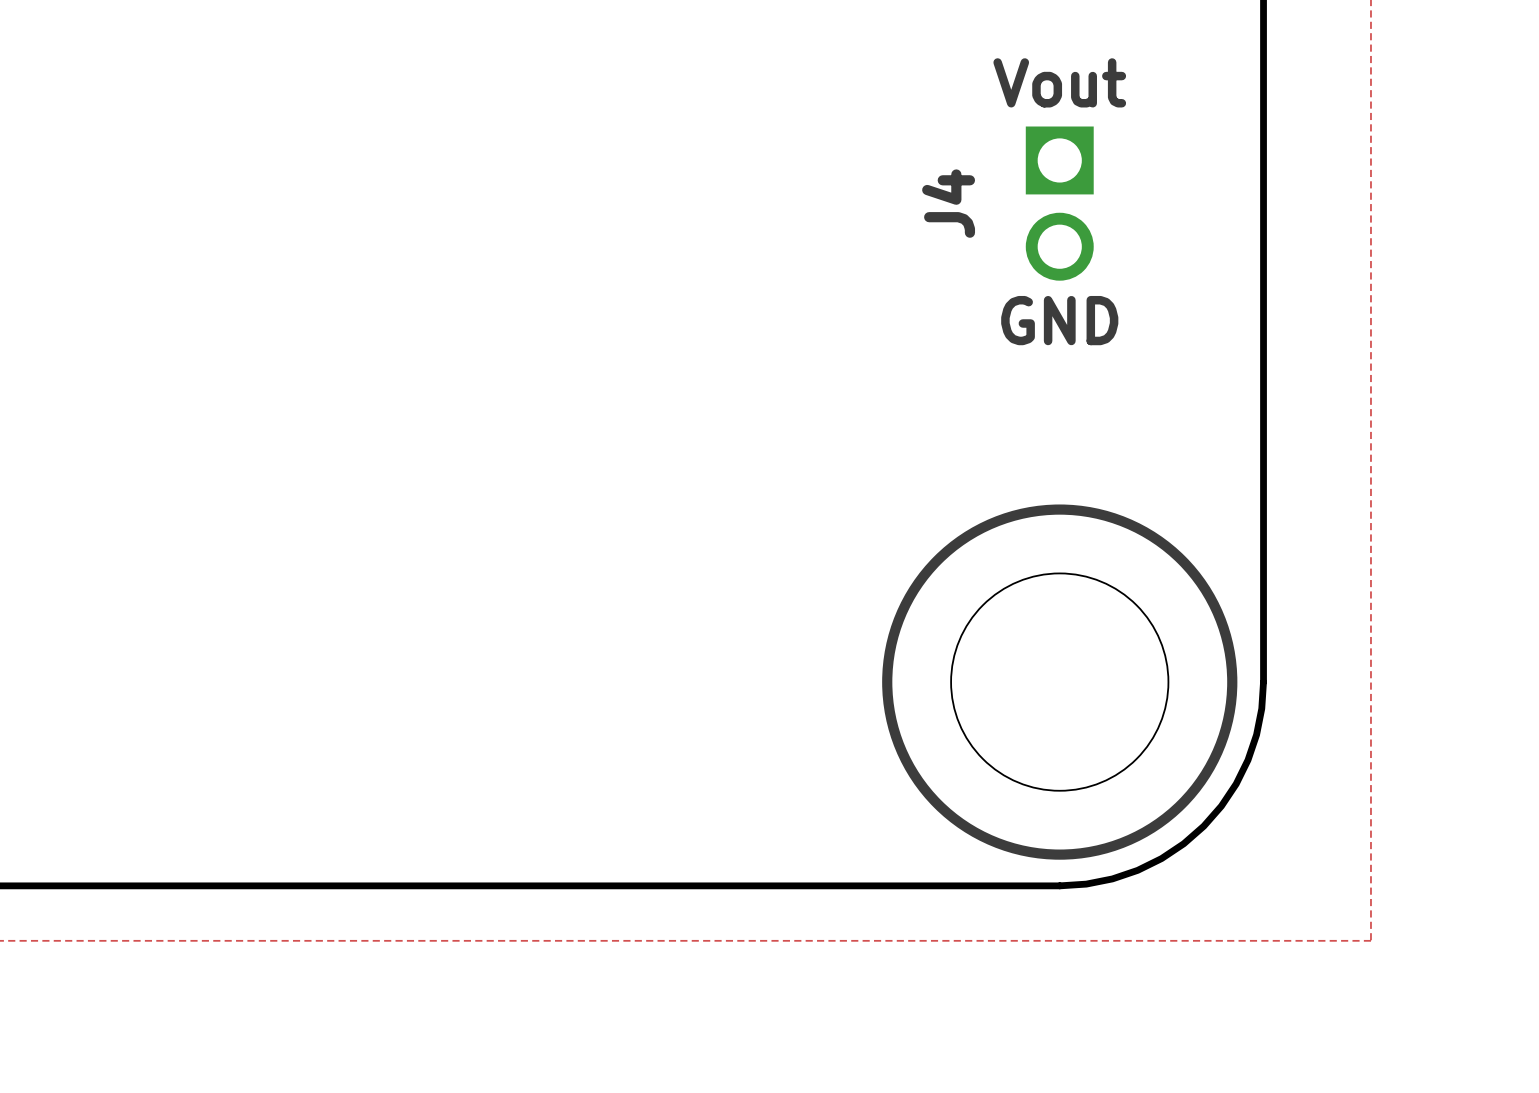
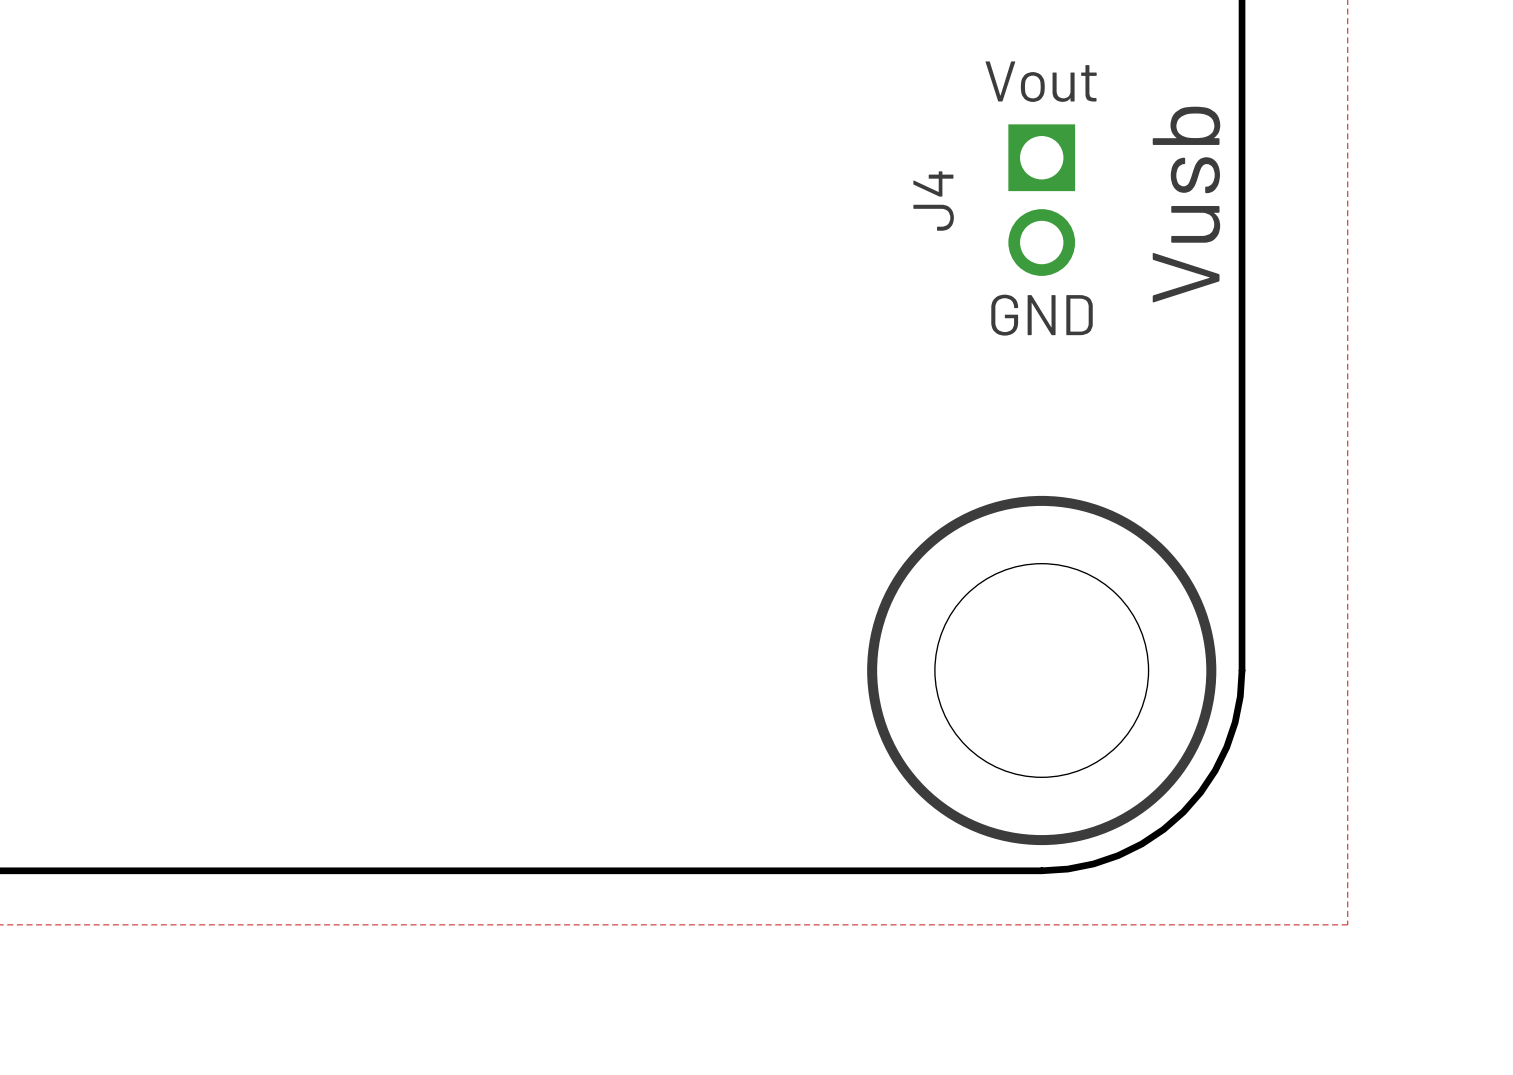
text: none -> Vusb (1186, 204)

